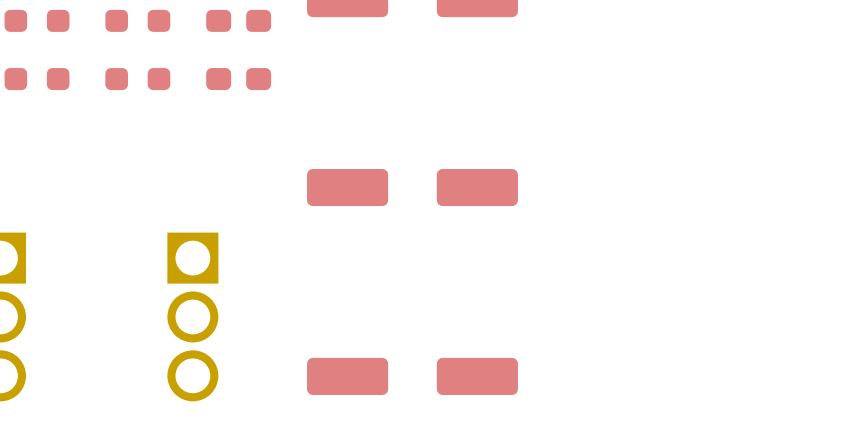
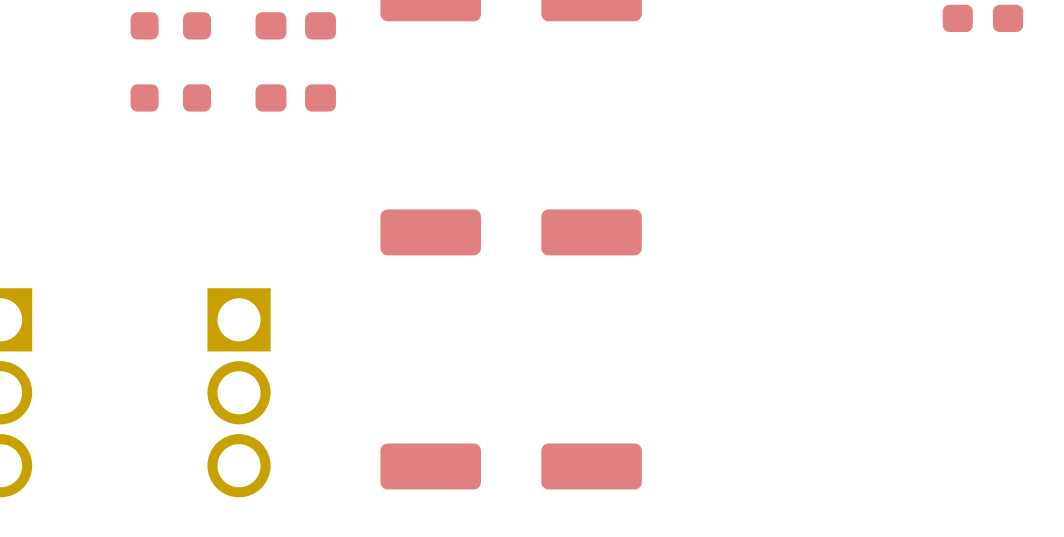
part: none -> (982, 18)
part: (37, 20) -> none
part: (37, 79) -> none

